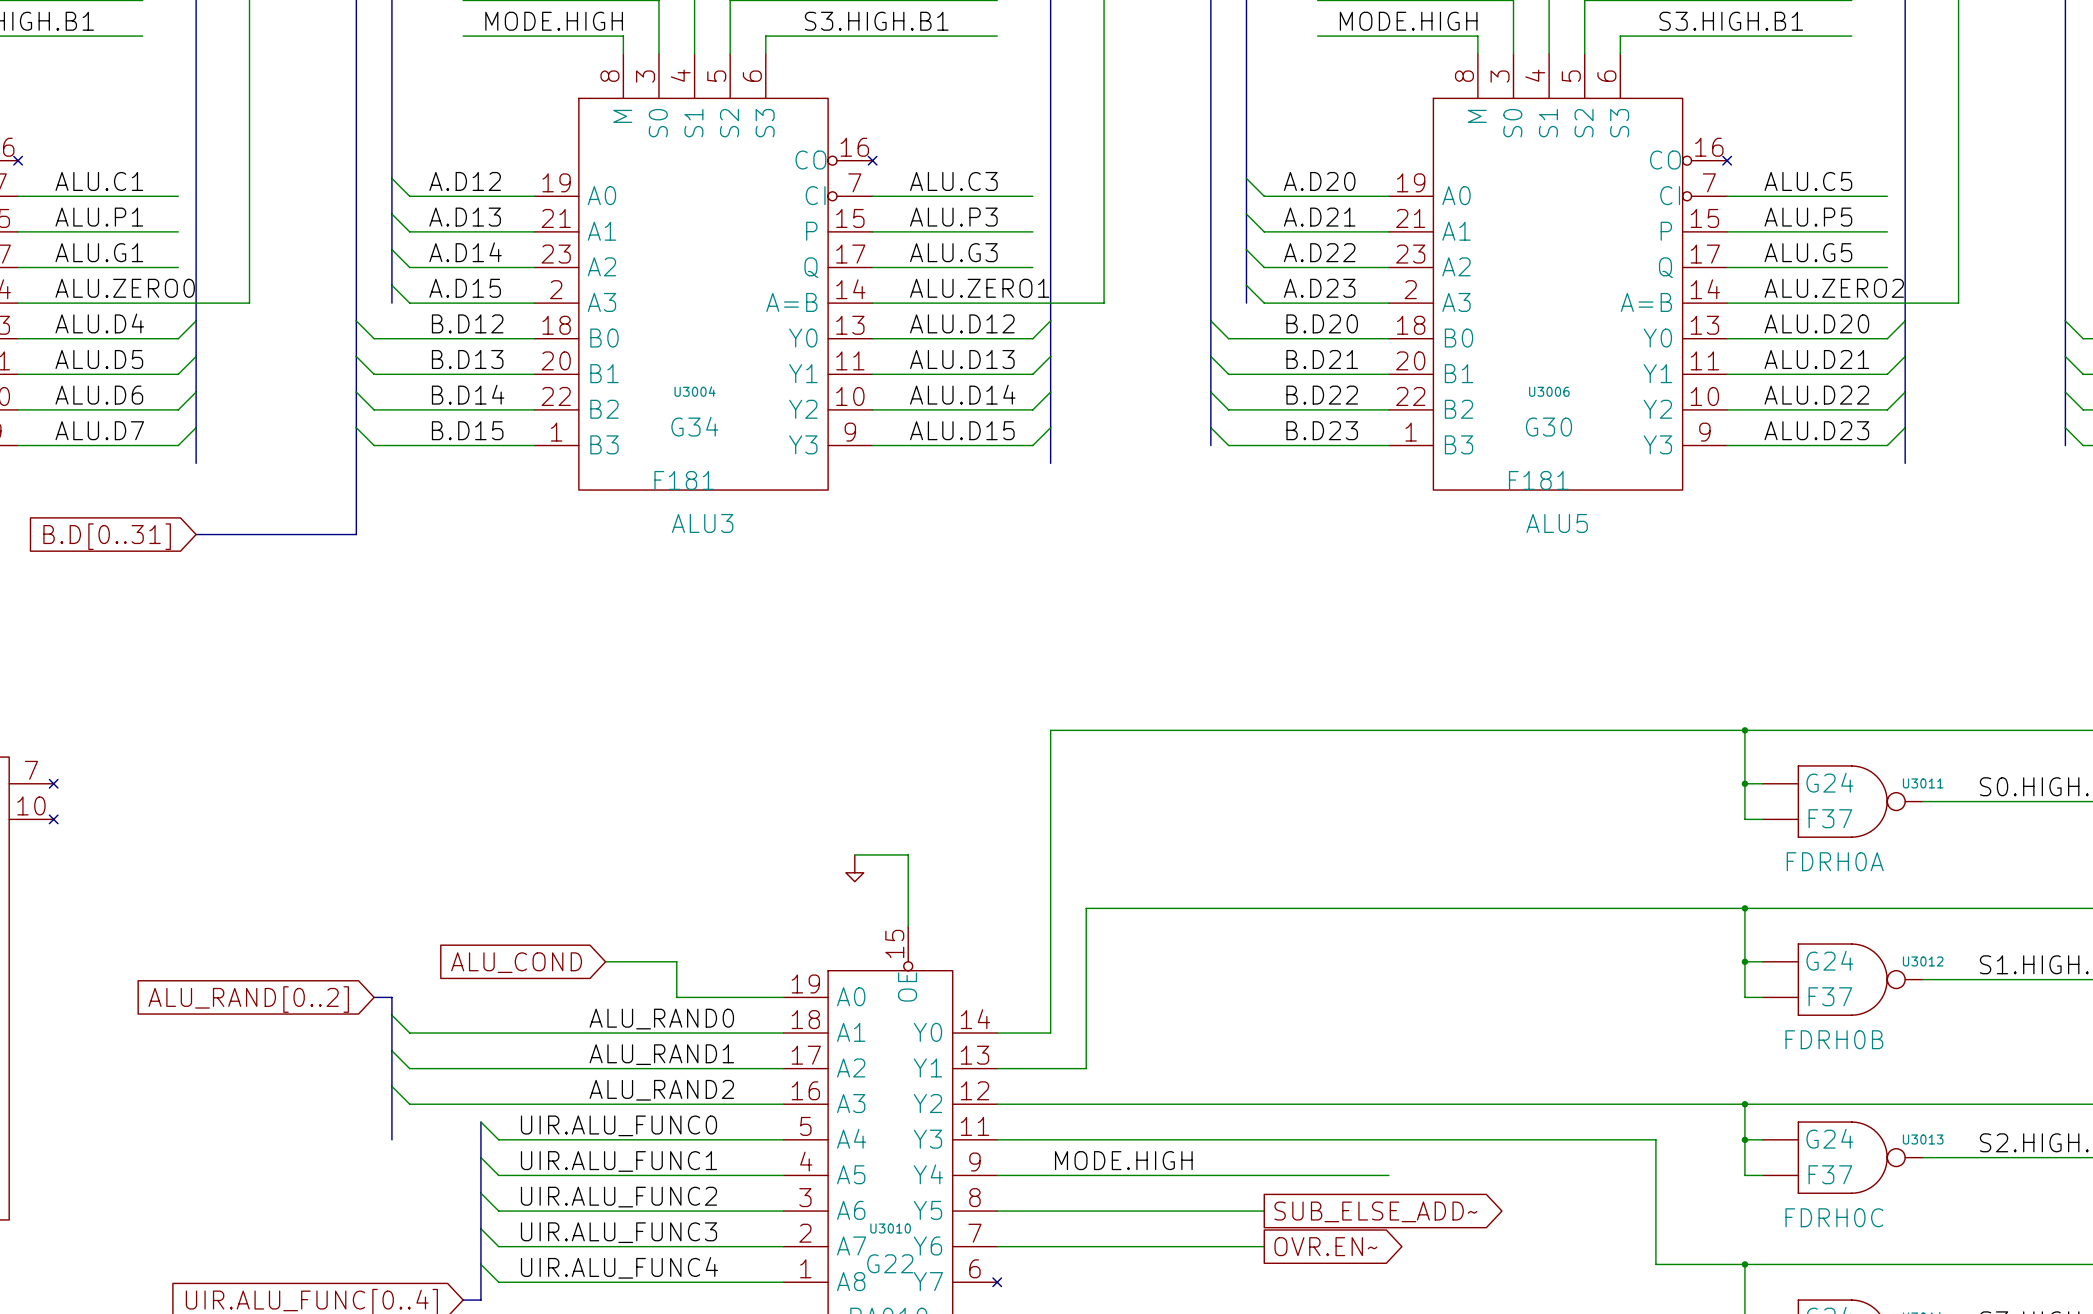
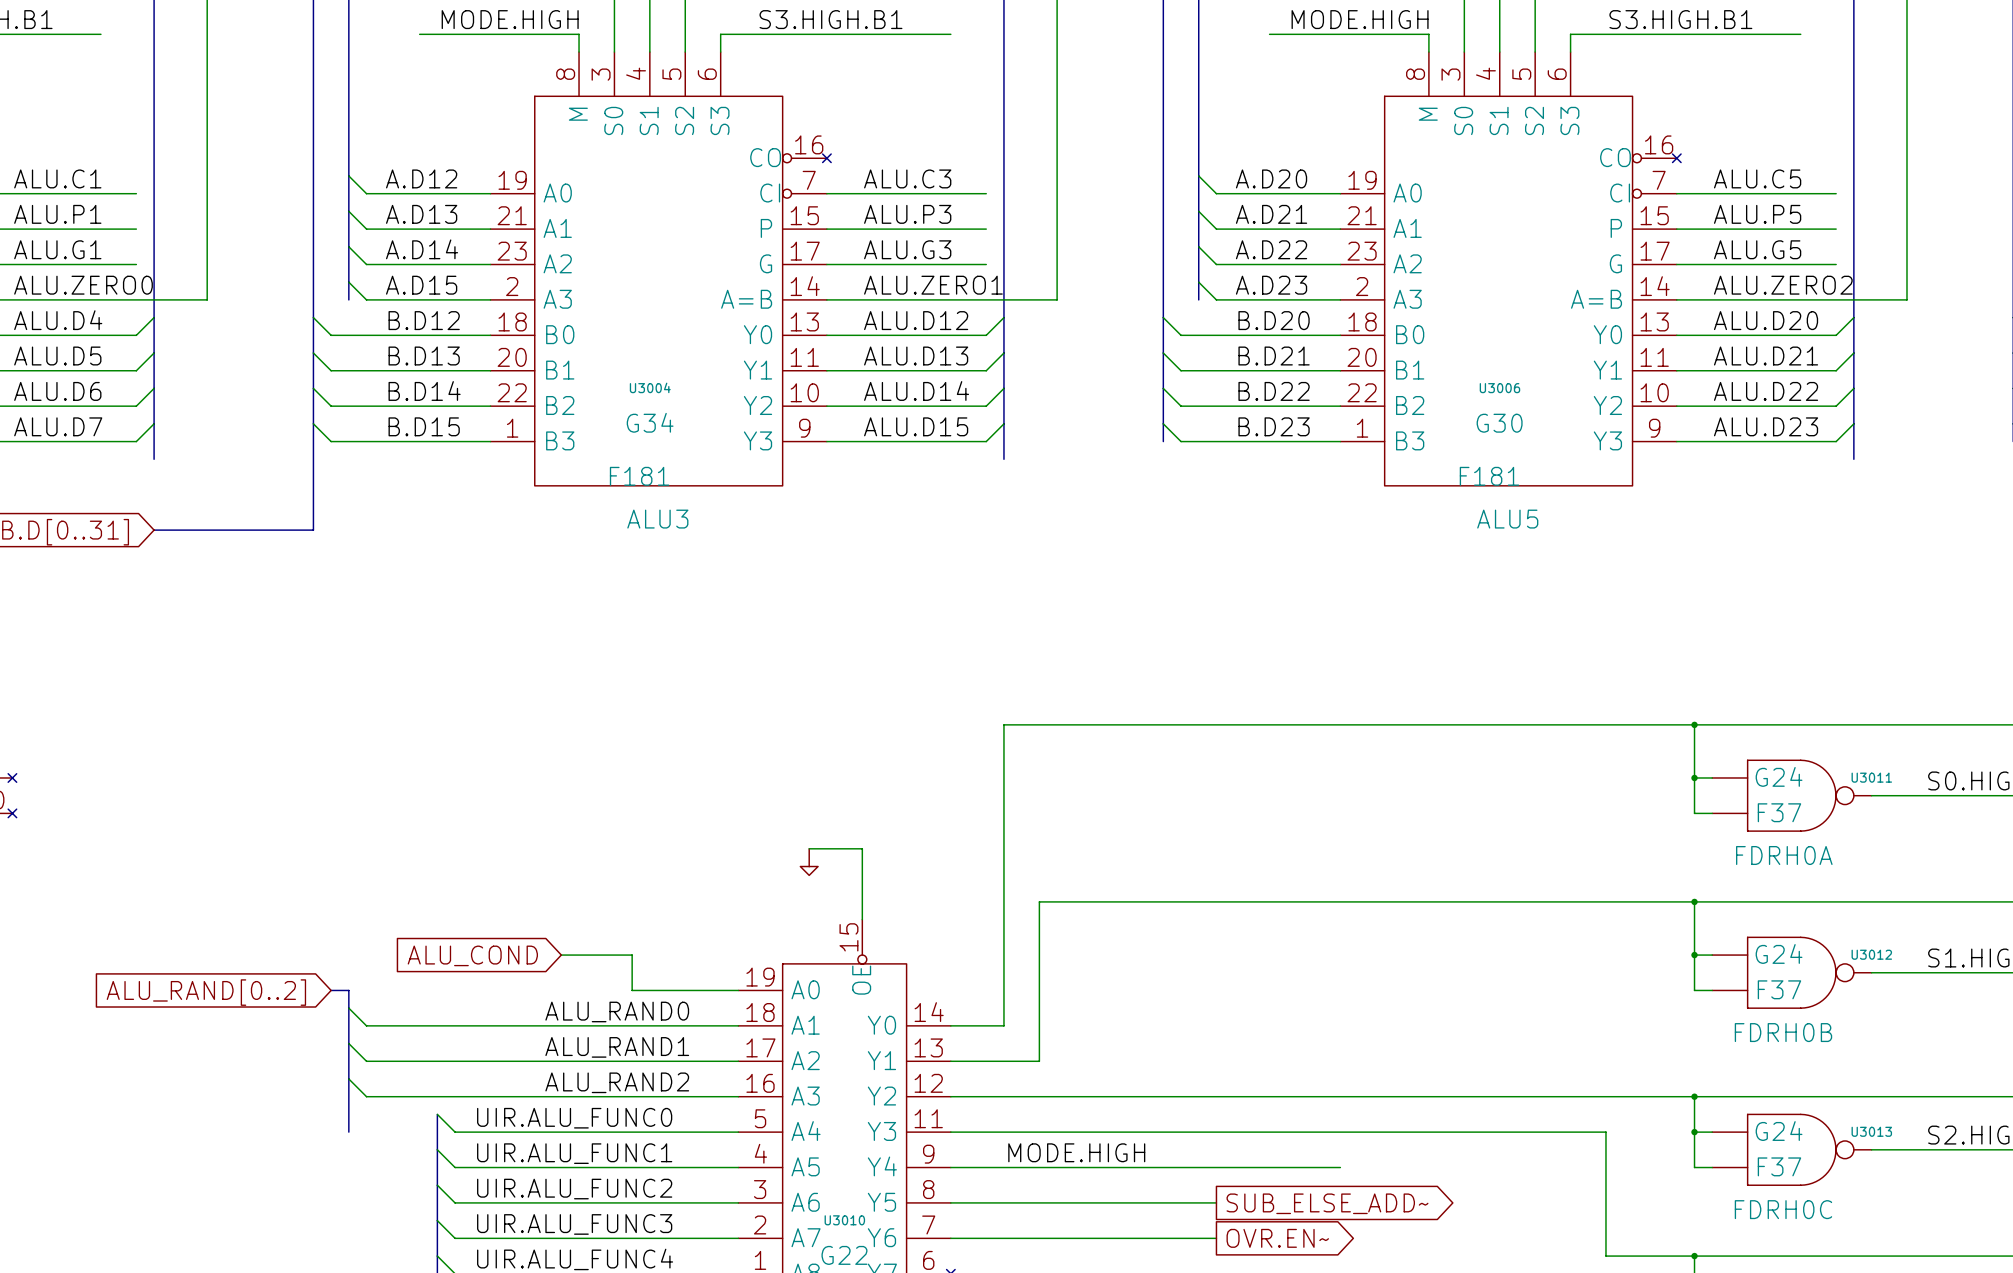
U3004 pin name: Q (811, 267) -> G (766, 263)
U3006 pin name: Q (1665, 267) -> G (1615, 263)

